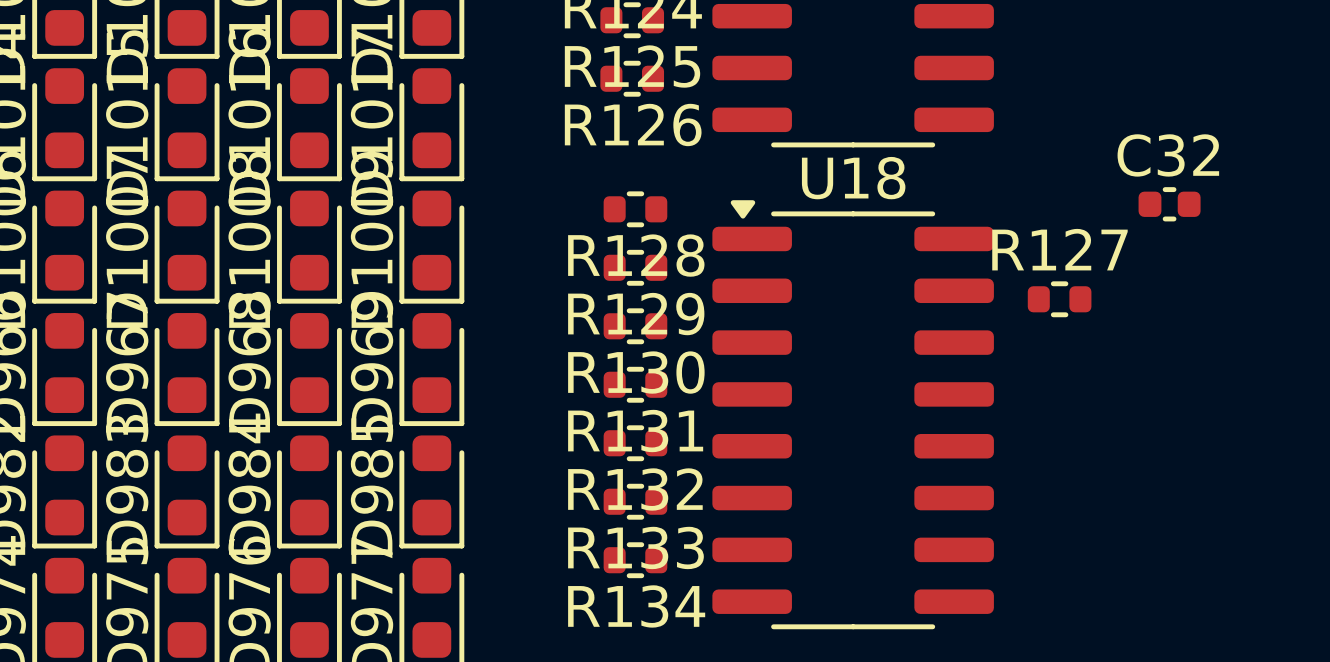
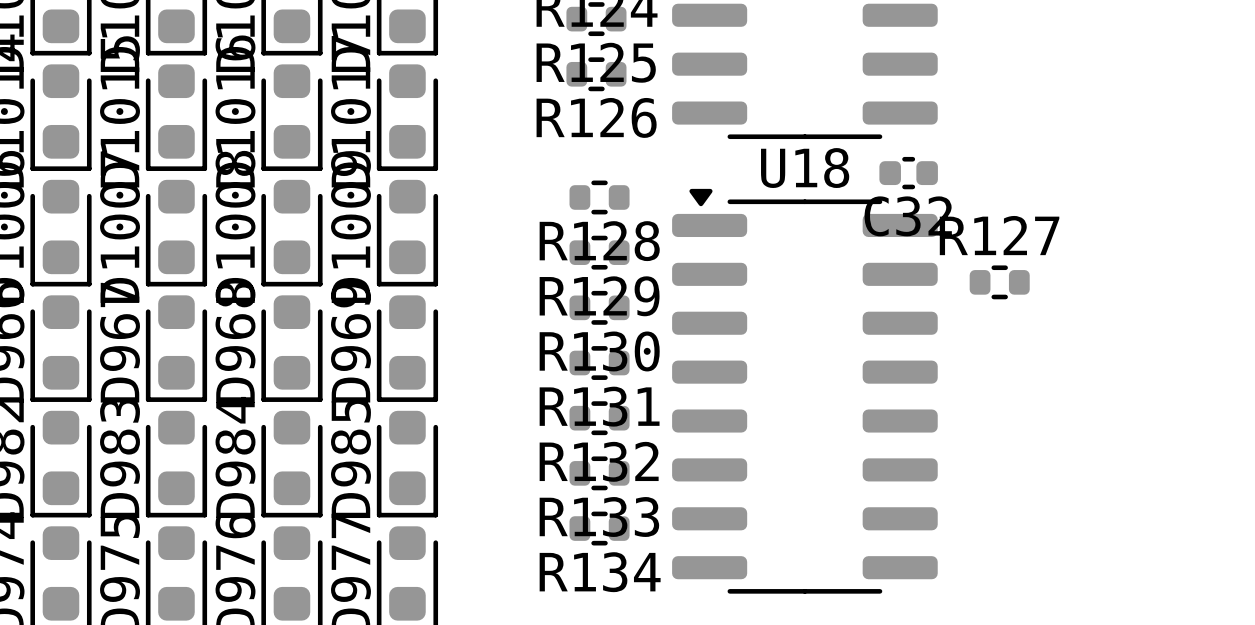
C32 name position: C32 (1168, 155) -> C32 (908, 216)
C32 position: (1169, 204) -> (908, 173)

